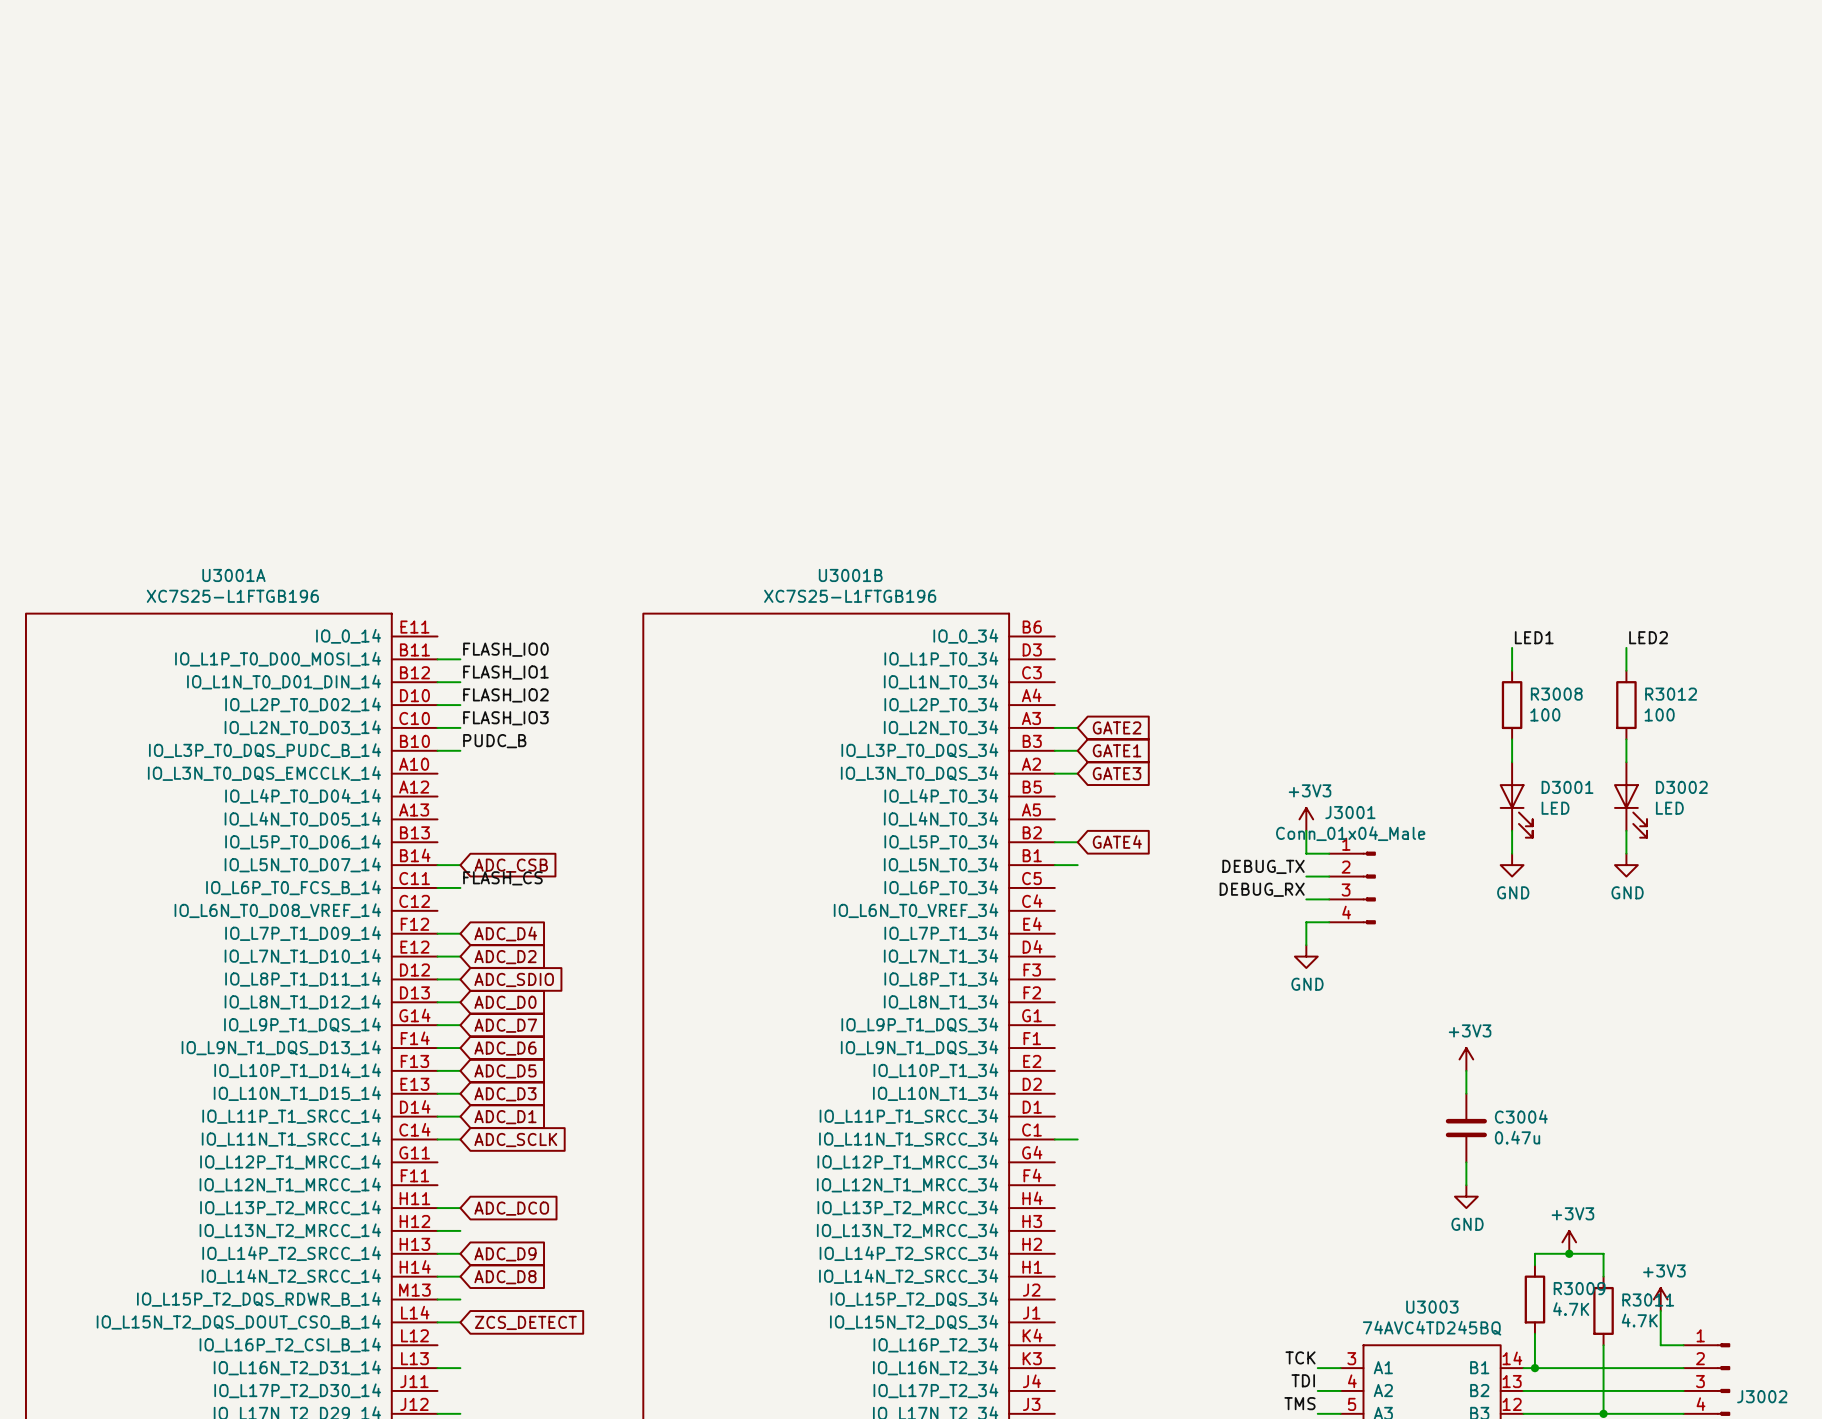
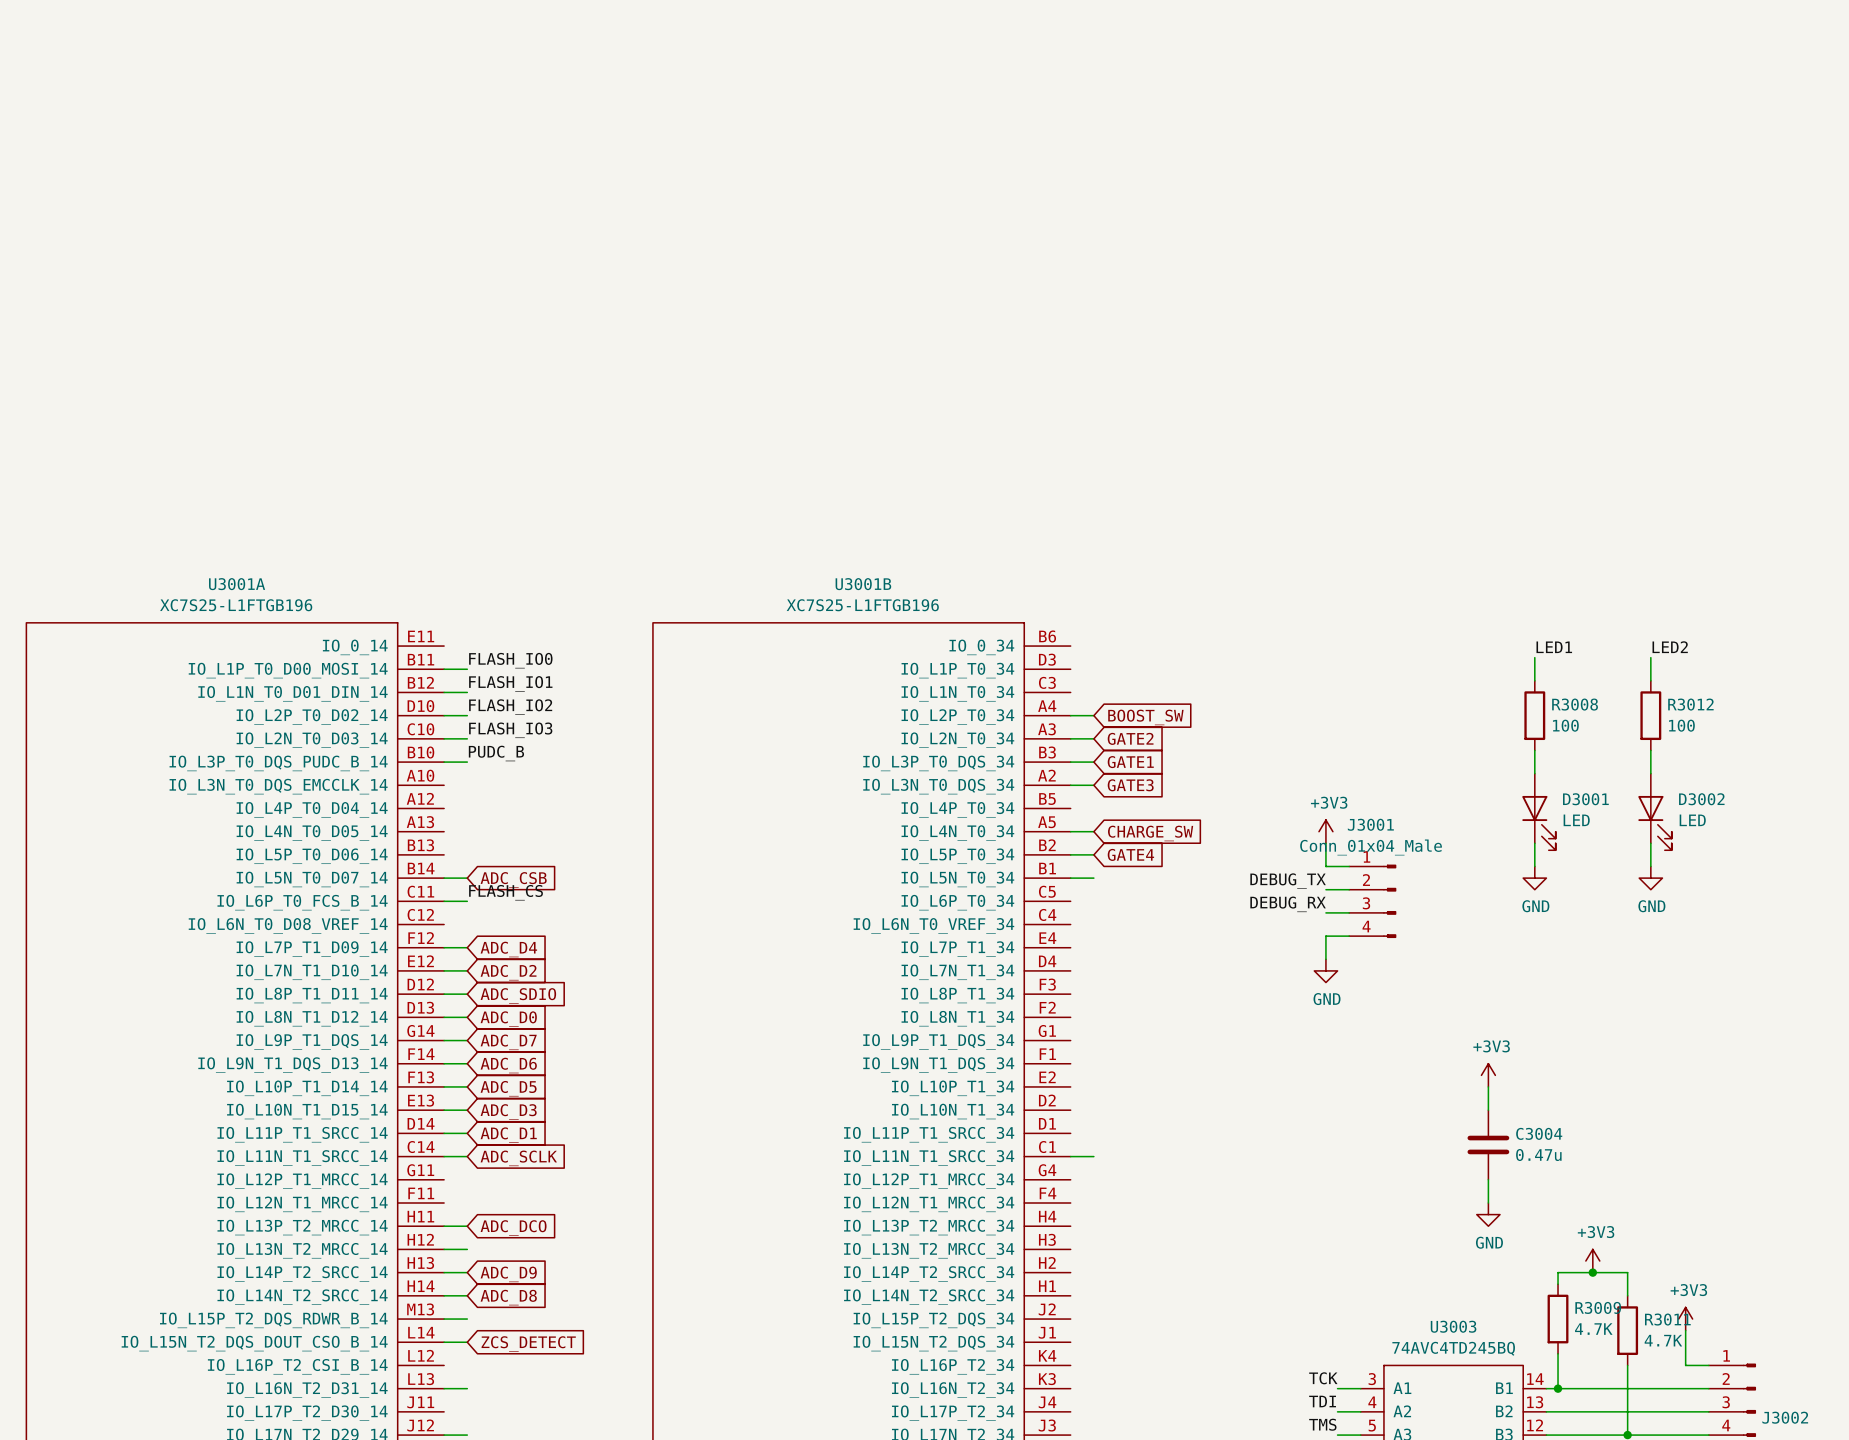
wire: none -> (1070, 715) (1093, 715)
global label: none -> BOOST_SW (1145, 717)
wire: none -> (1070, 831) (1093, 831)
global label: none -> CHARGE_SW (1150, 833)

